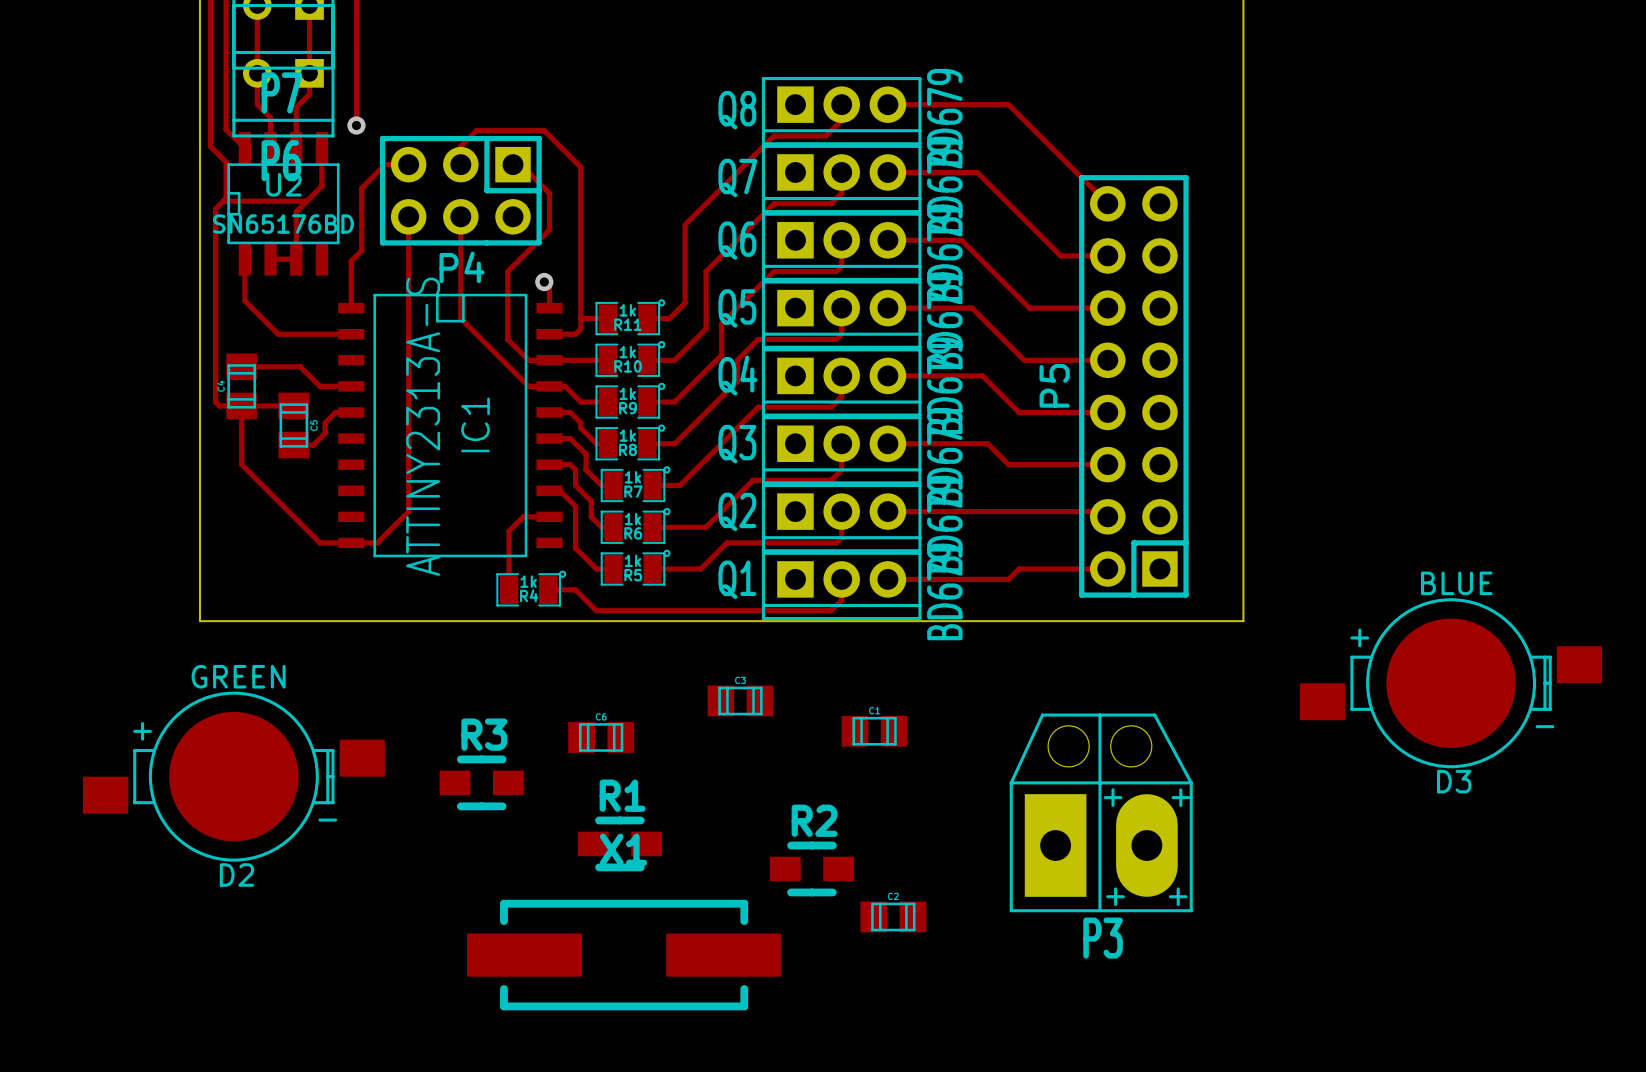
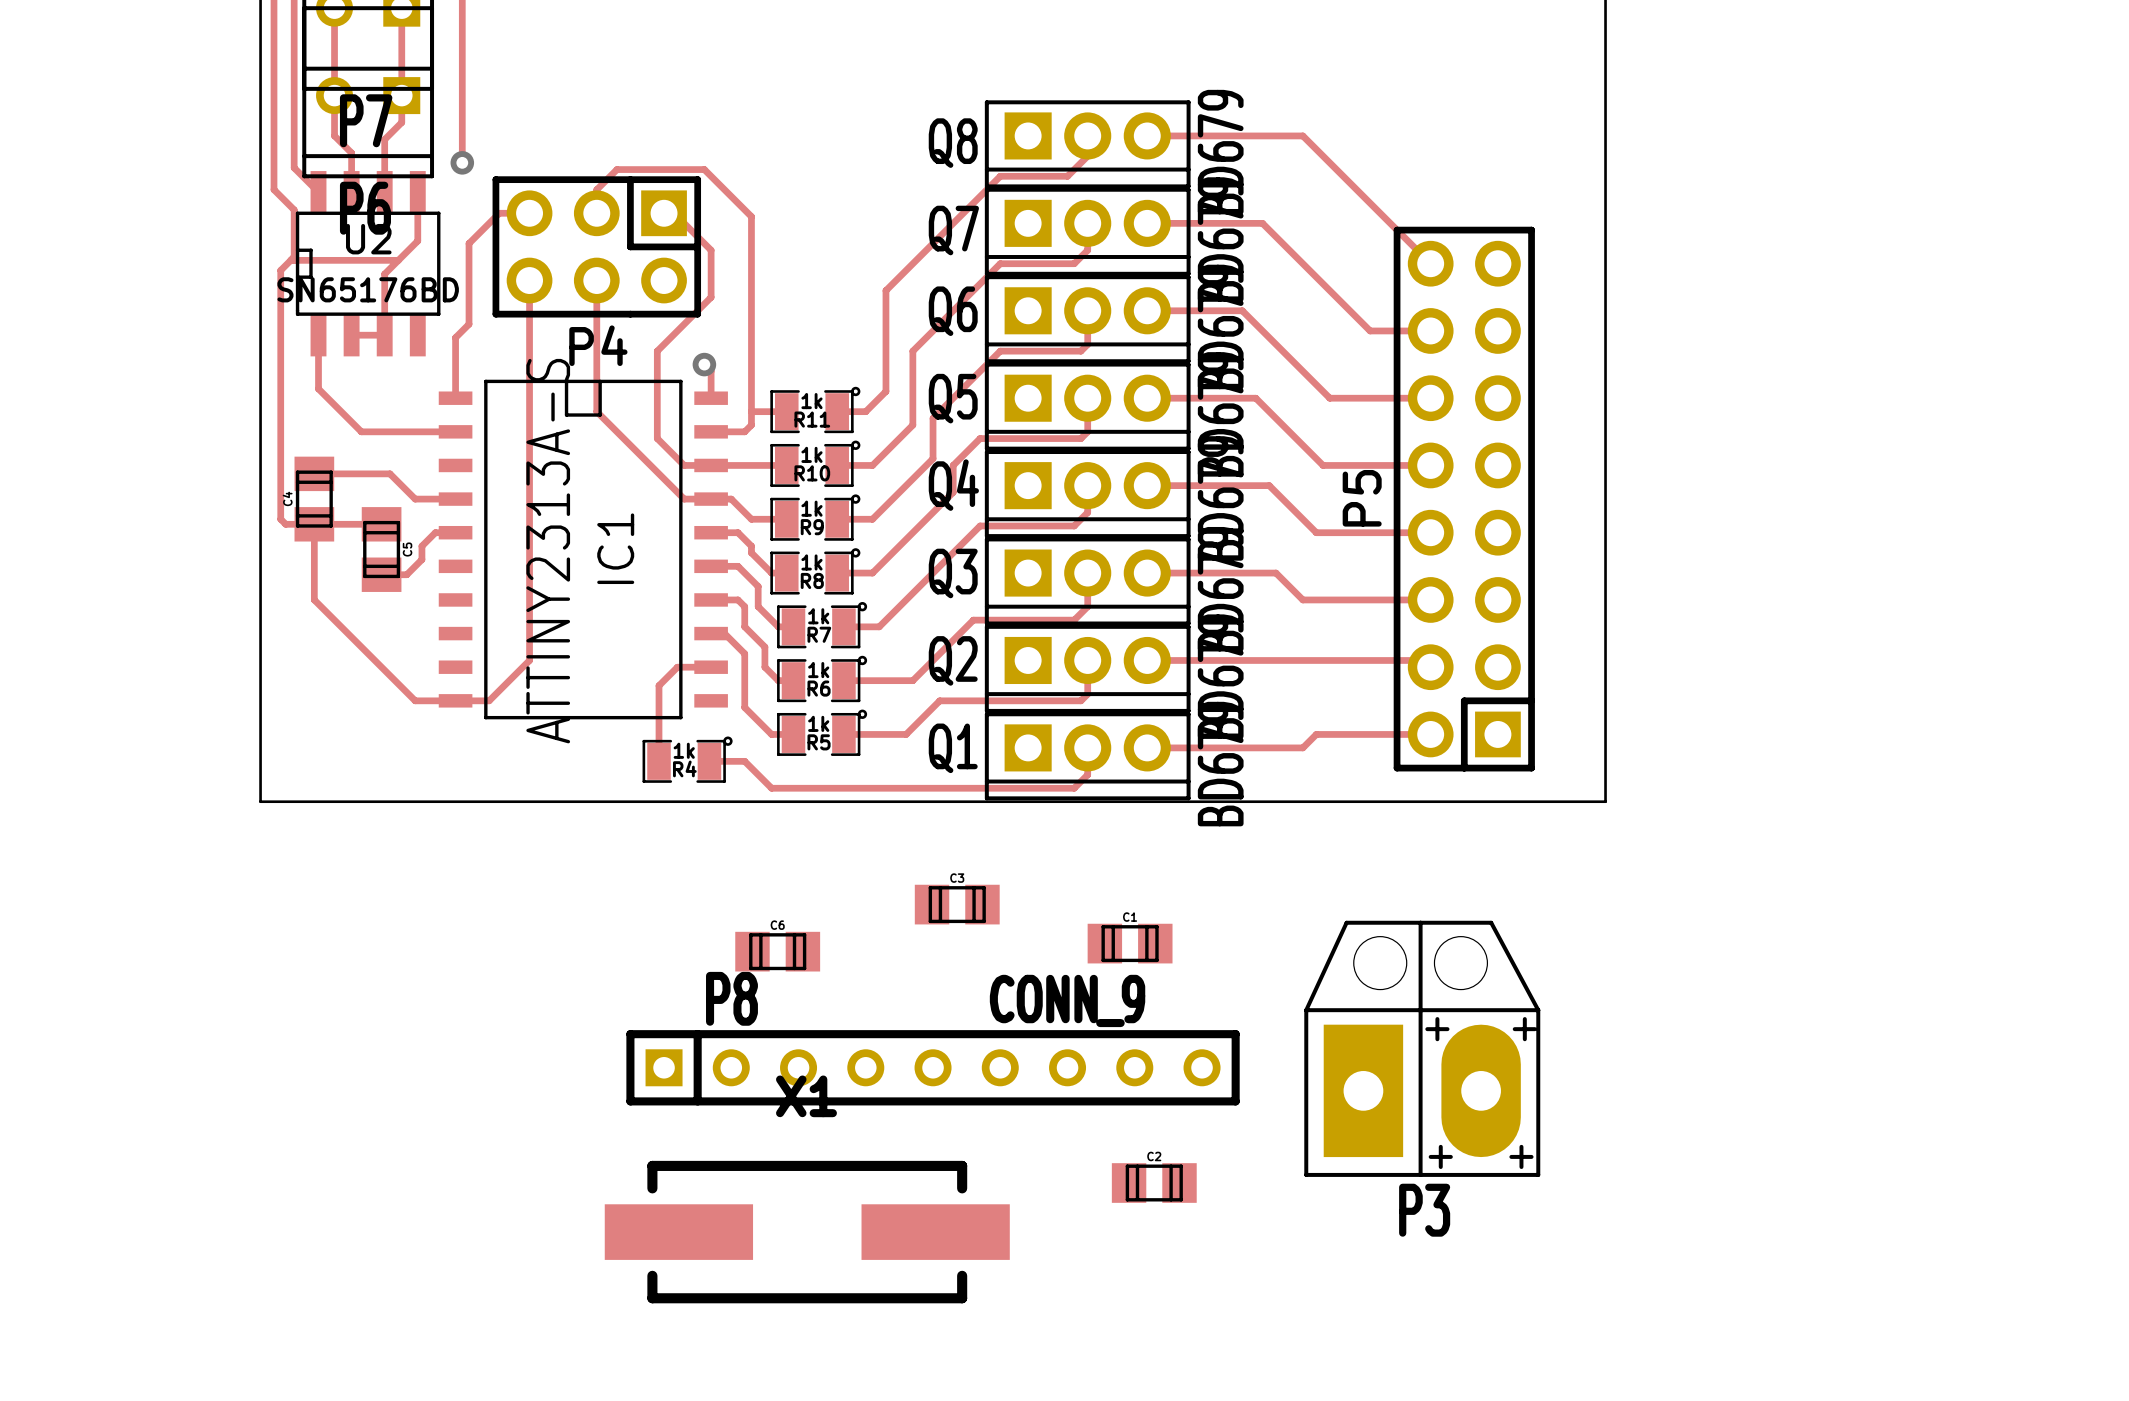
D3: BLUE (1451, 683) -> none
D2: GREEN (233, 776) -> none
R3: (481, 782) -> none
P8: none -> CONN_9 (933, 1067)
R1: (619, 843) -> none
R2: (811, 868) -> none

